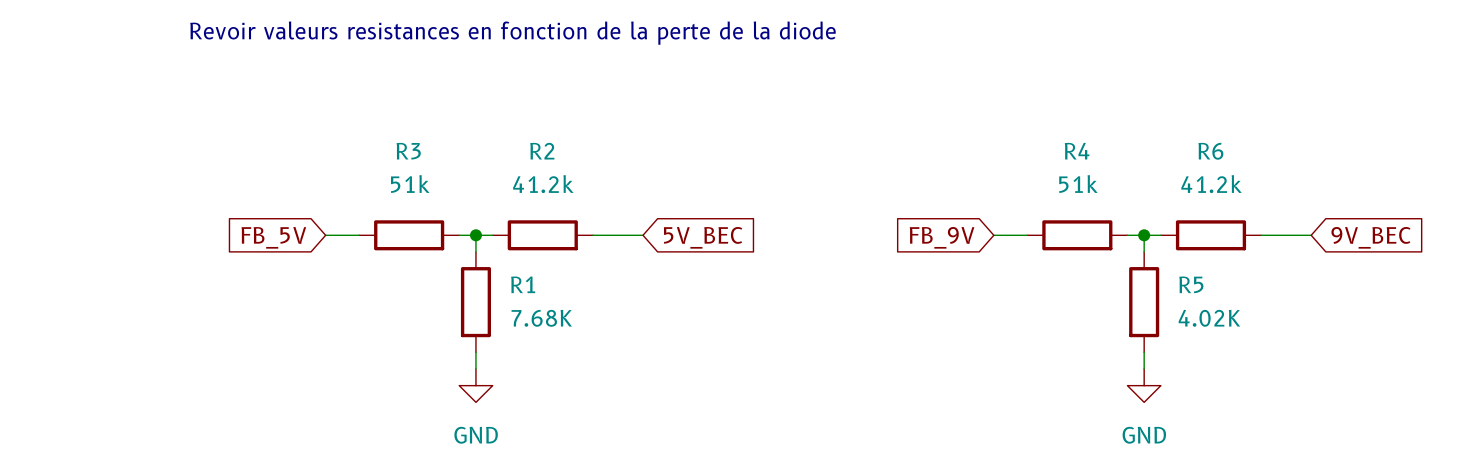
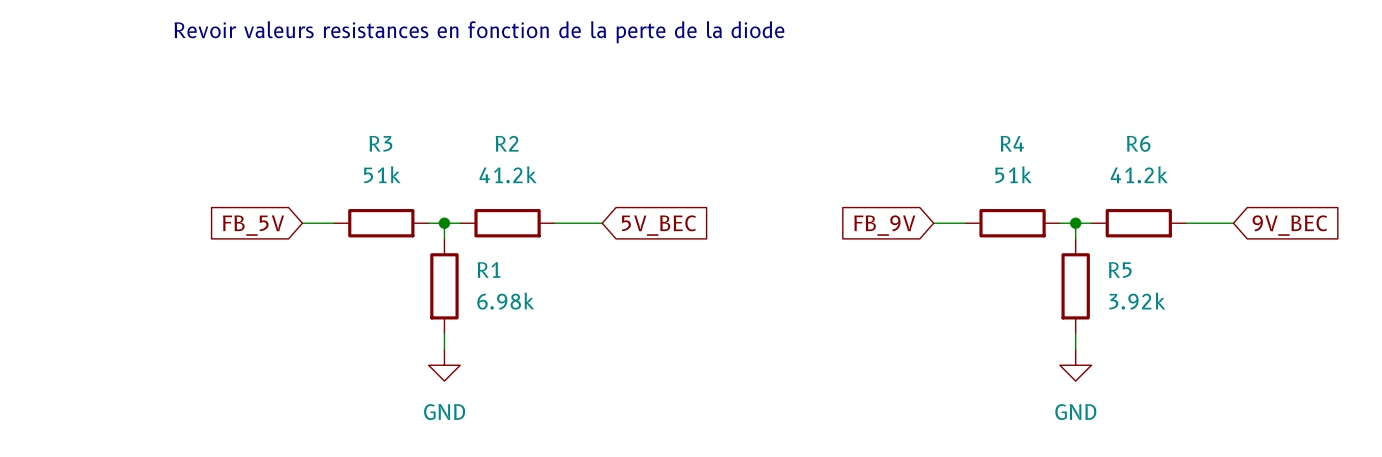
R1 value: 7.68K (541, 318) -> 6.98k (505, 301)
R5 value: 4.02K (1209, 318) -> 3.92k (1137, 301)

